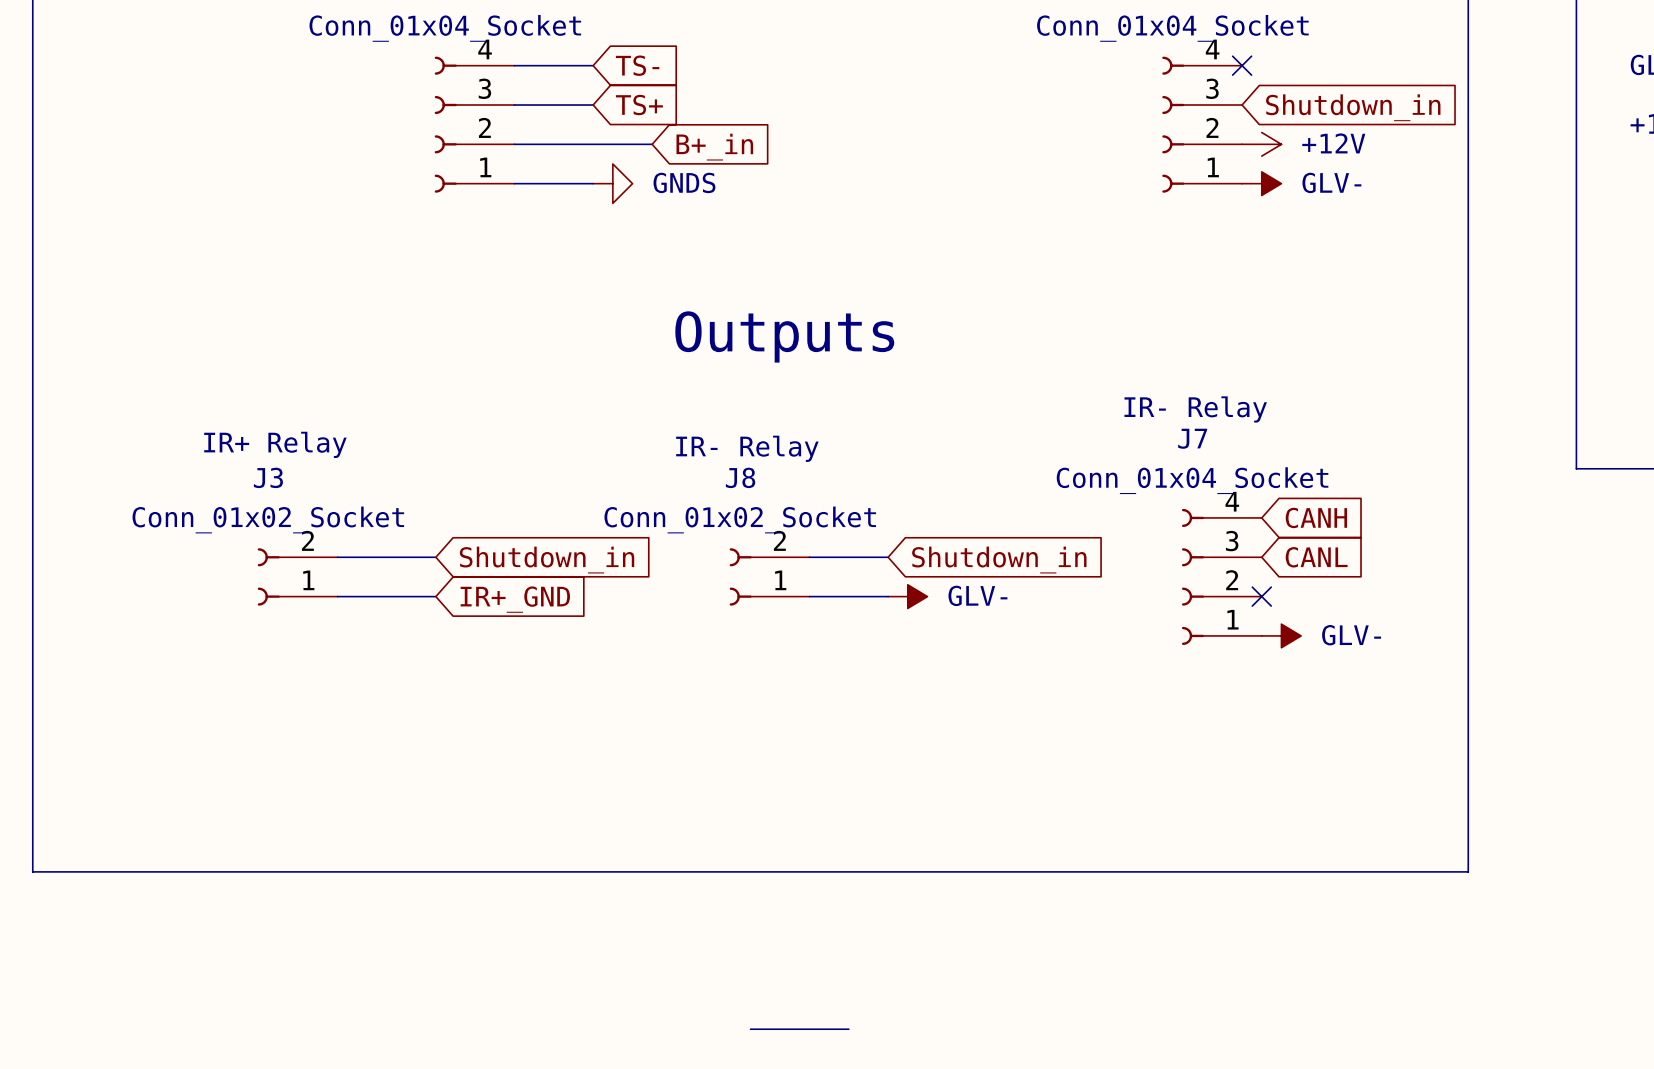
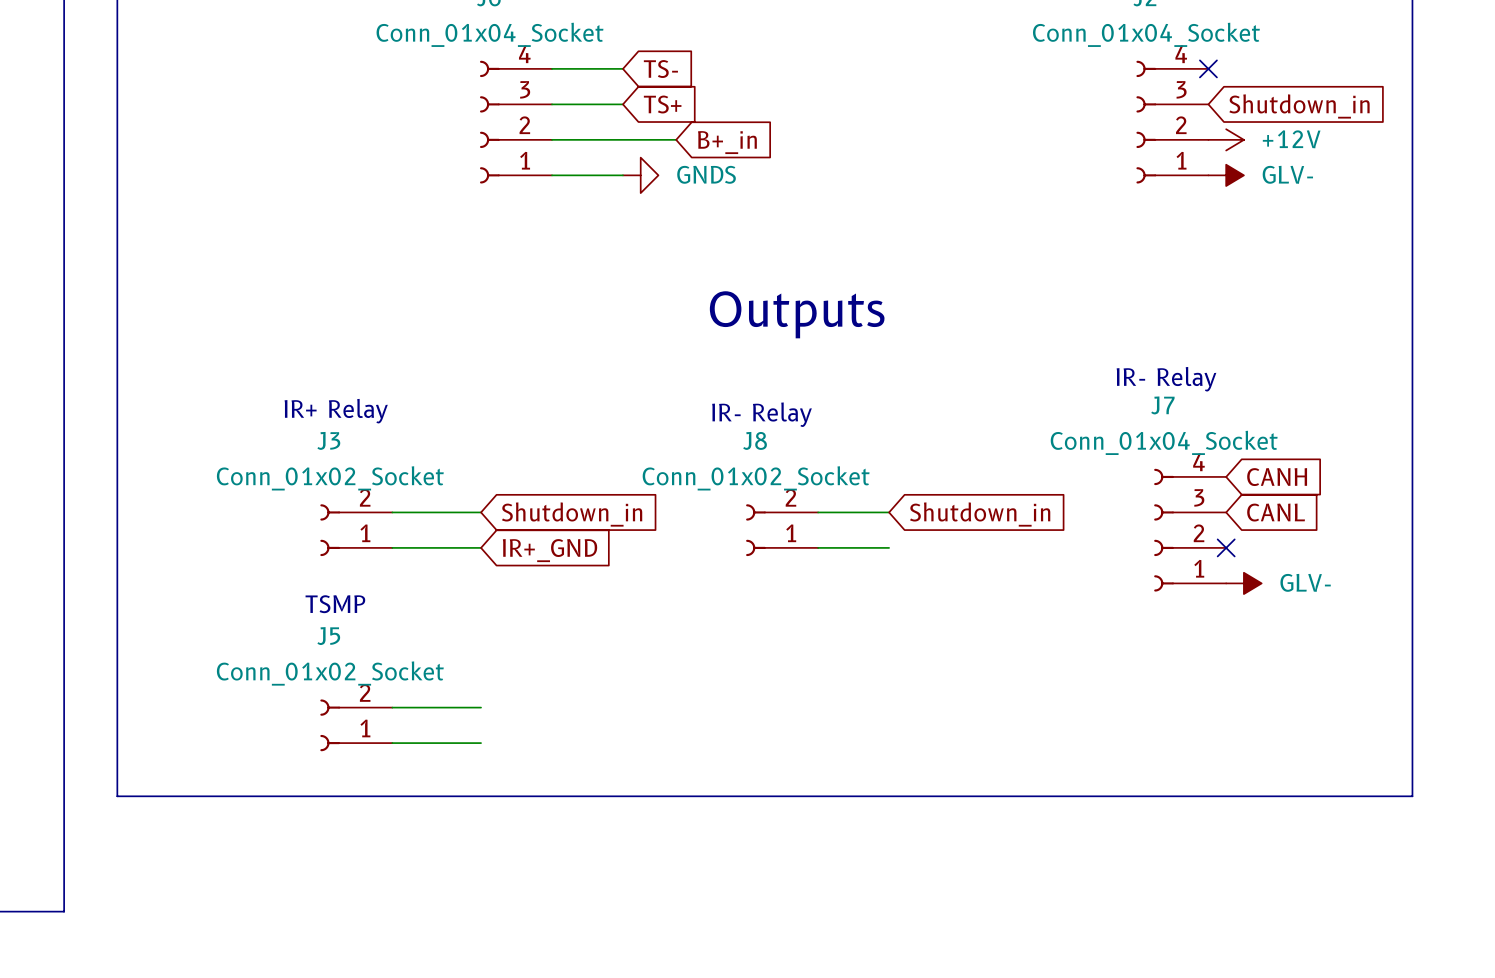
power symbol: GLV- (907, 596) -> none
text: none -> TSMP (335, 604)
wire: none -> (392, 707) (481, 707)
J5: none -> Conn_01x02_Socket (356, 725)
wire: none -> (392, 743) (481, 743)
wire: (750, 1029) (848, 1029) -> none

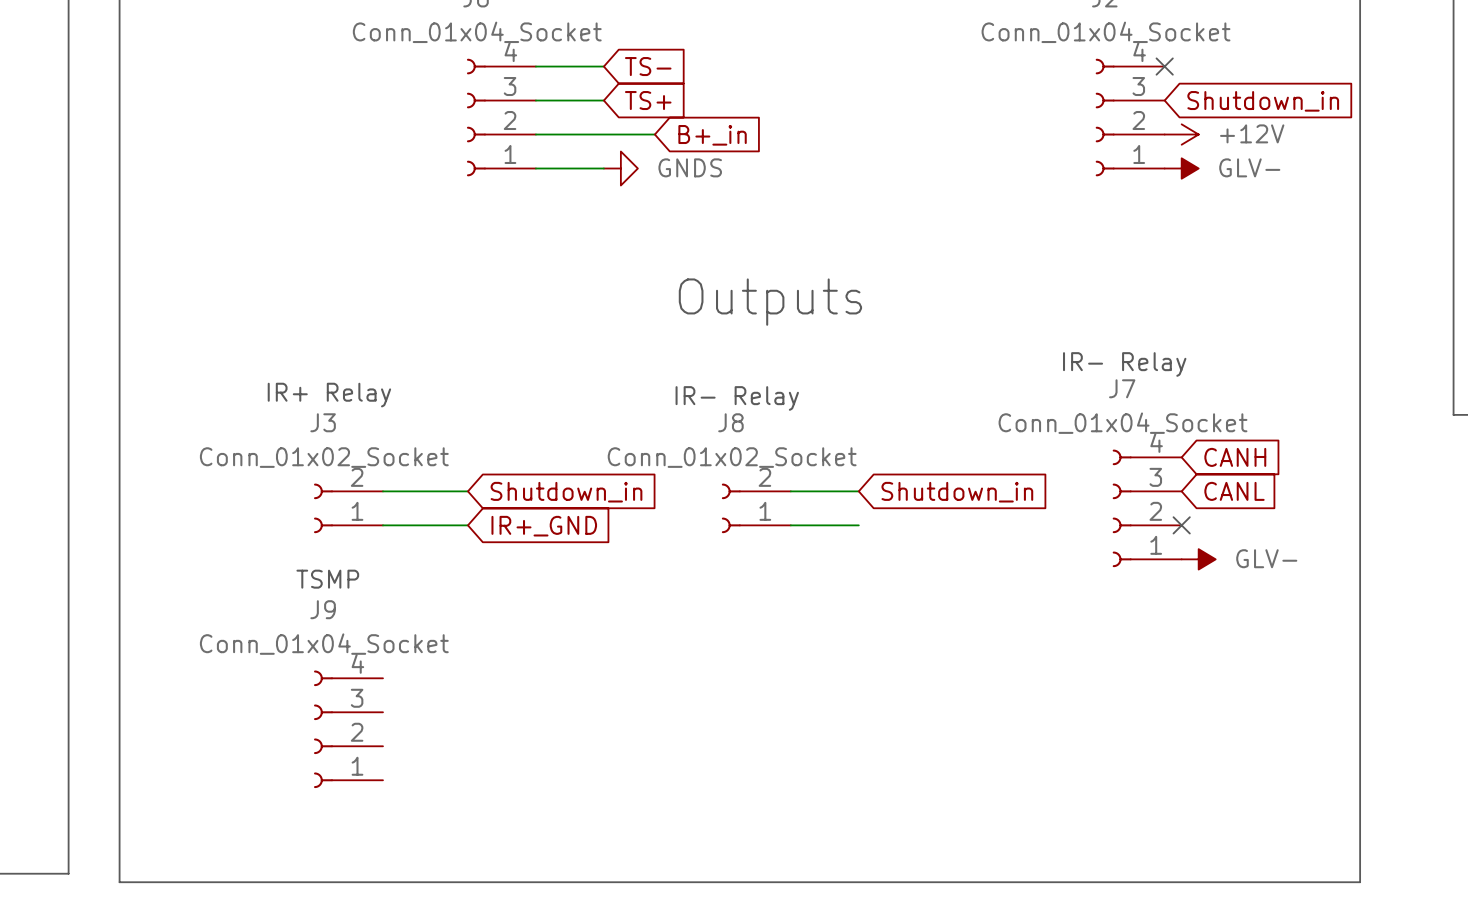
wire: (392, 707) (481, 707) -> none
J5: Conn_01x02_Socket (356, 725) -> none
wire: (392, 743) (481, 743) -> none
J9: none -> Conn_01x04_Socket (348, 729)
line: (117, 796) (1412, 796) -> (119, 763) (119, 882) (1360, 882) (1360, 763)

